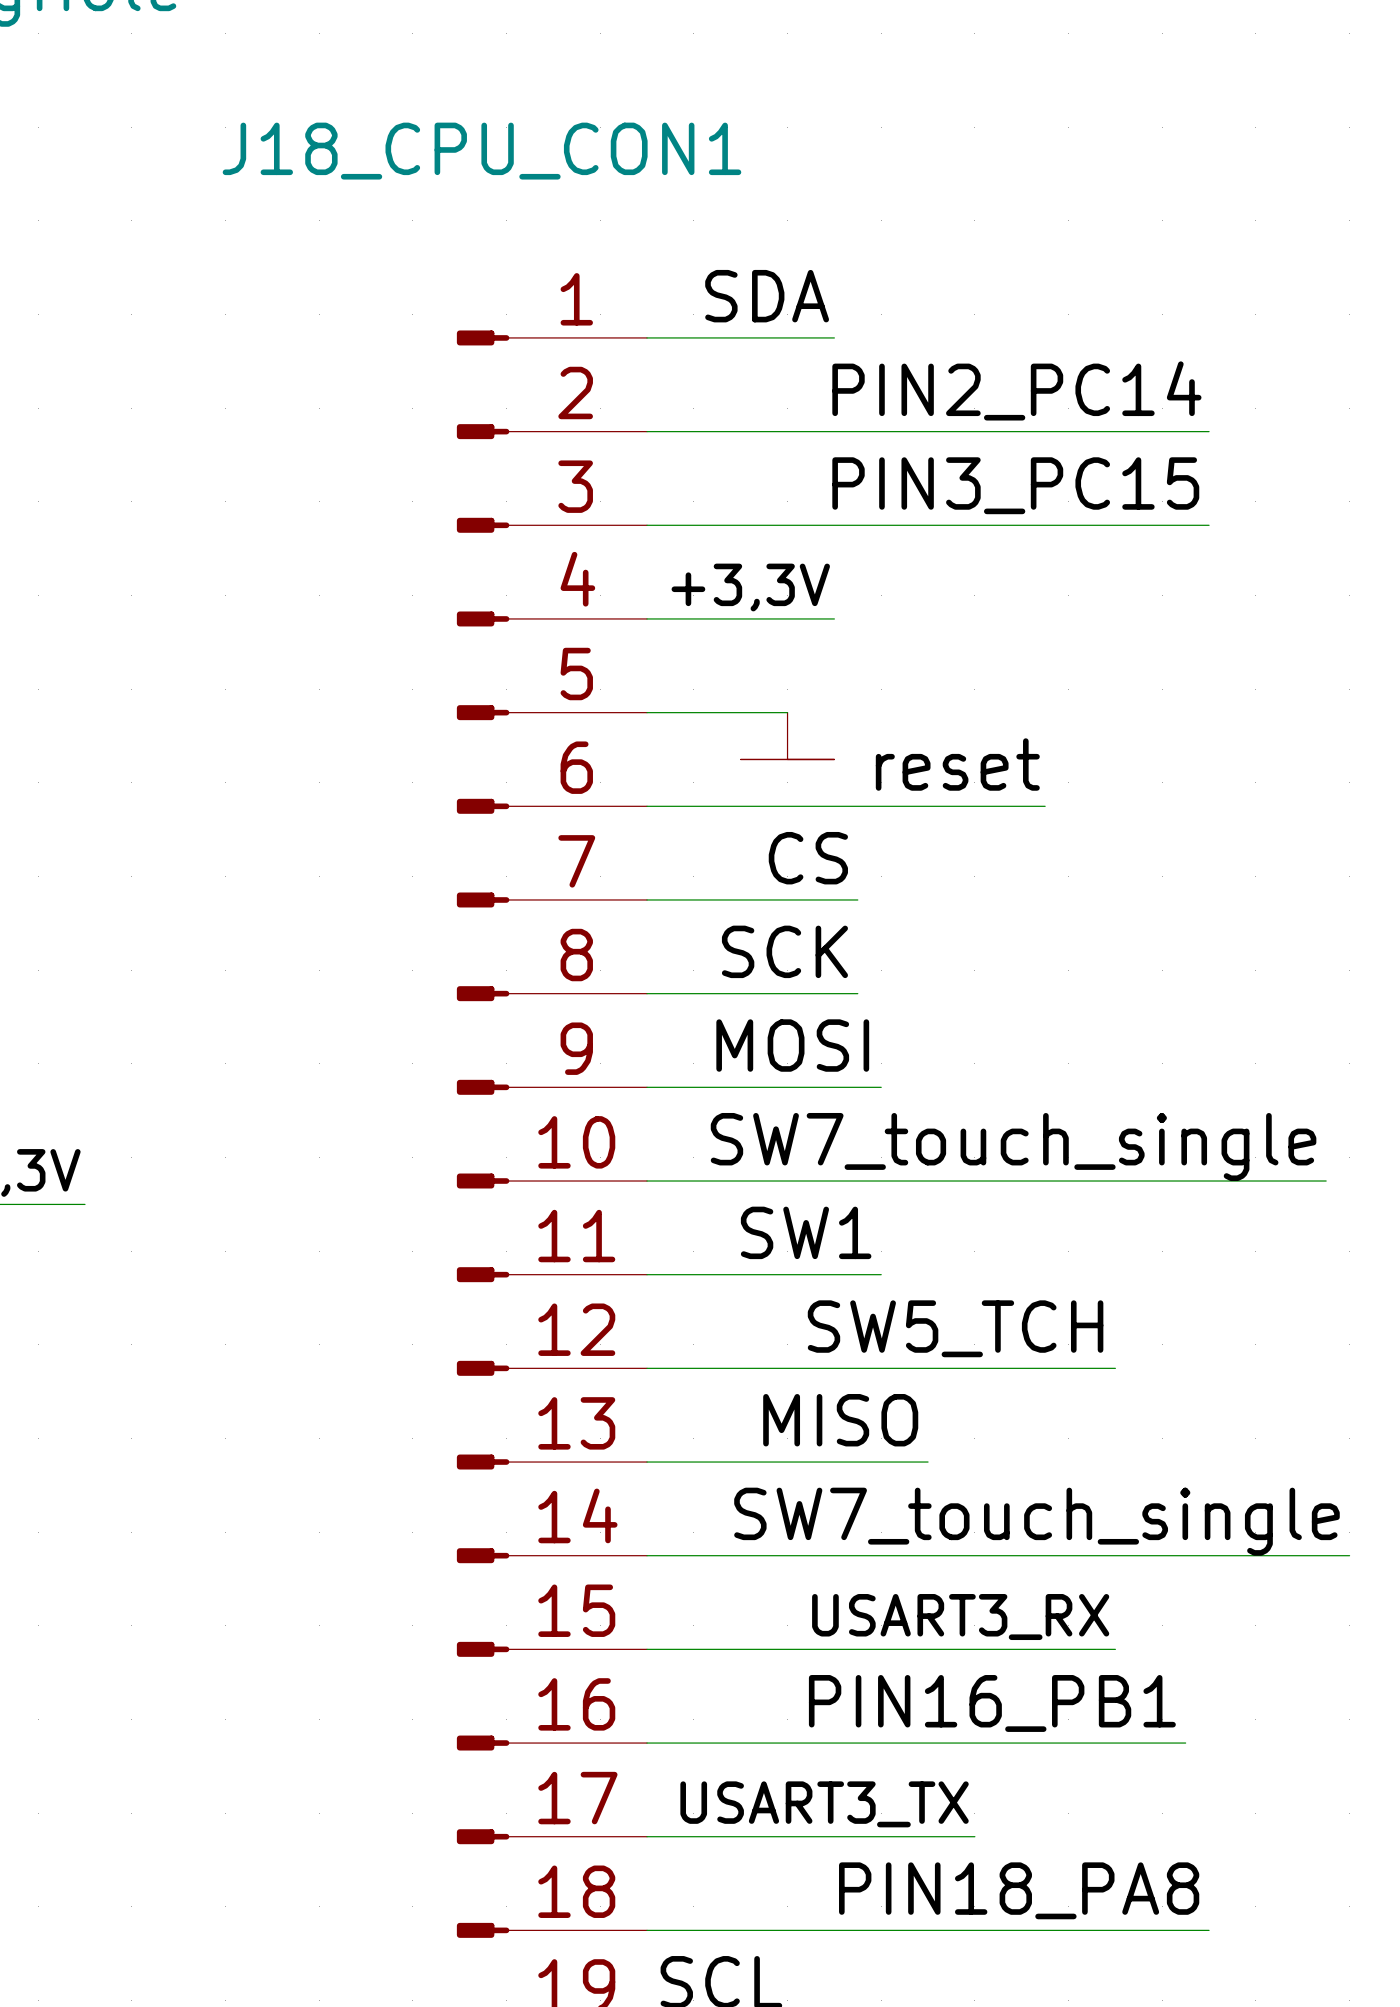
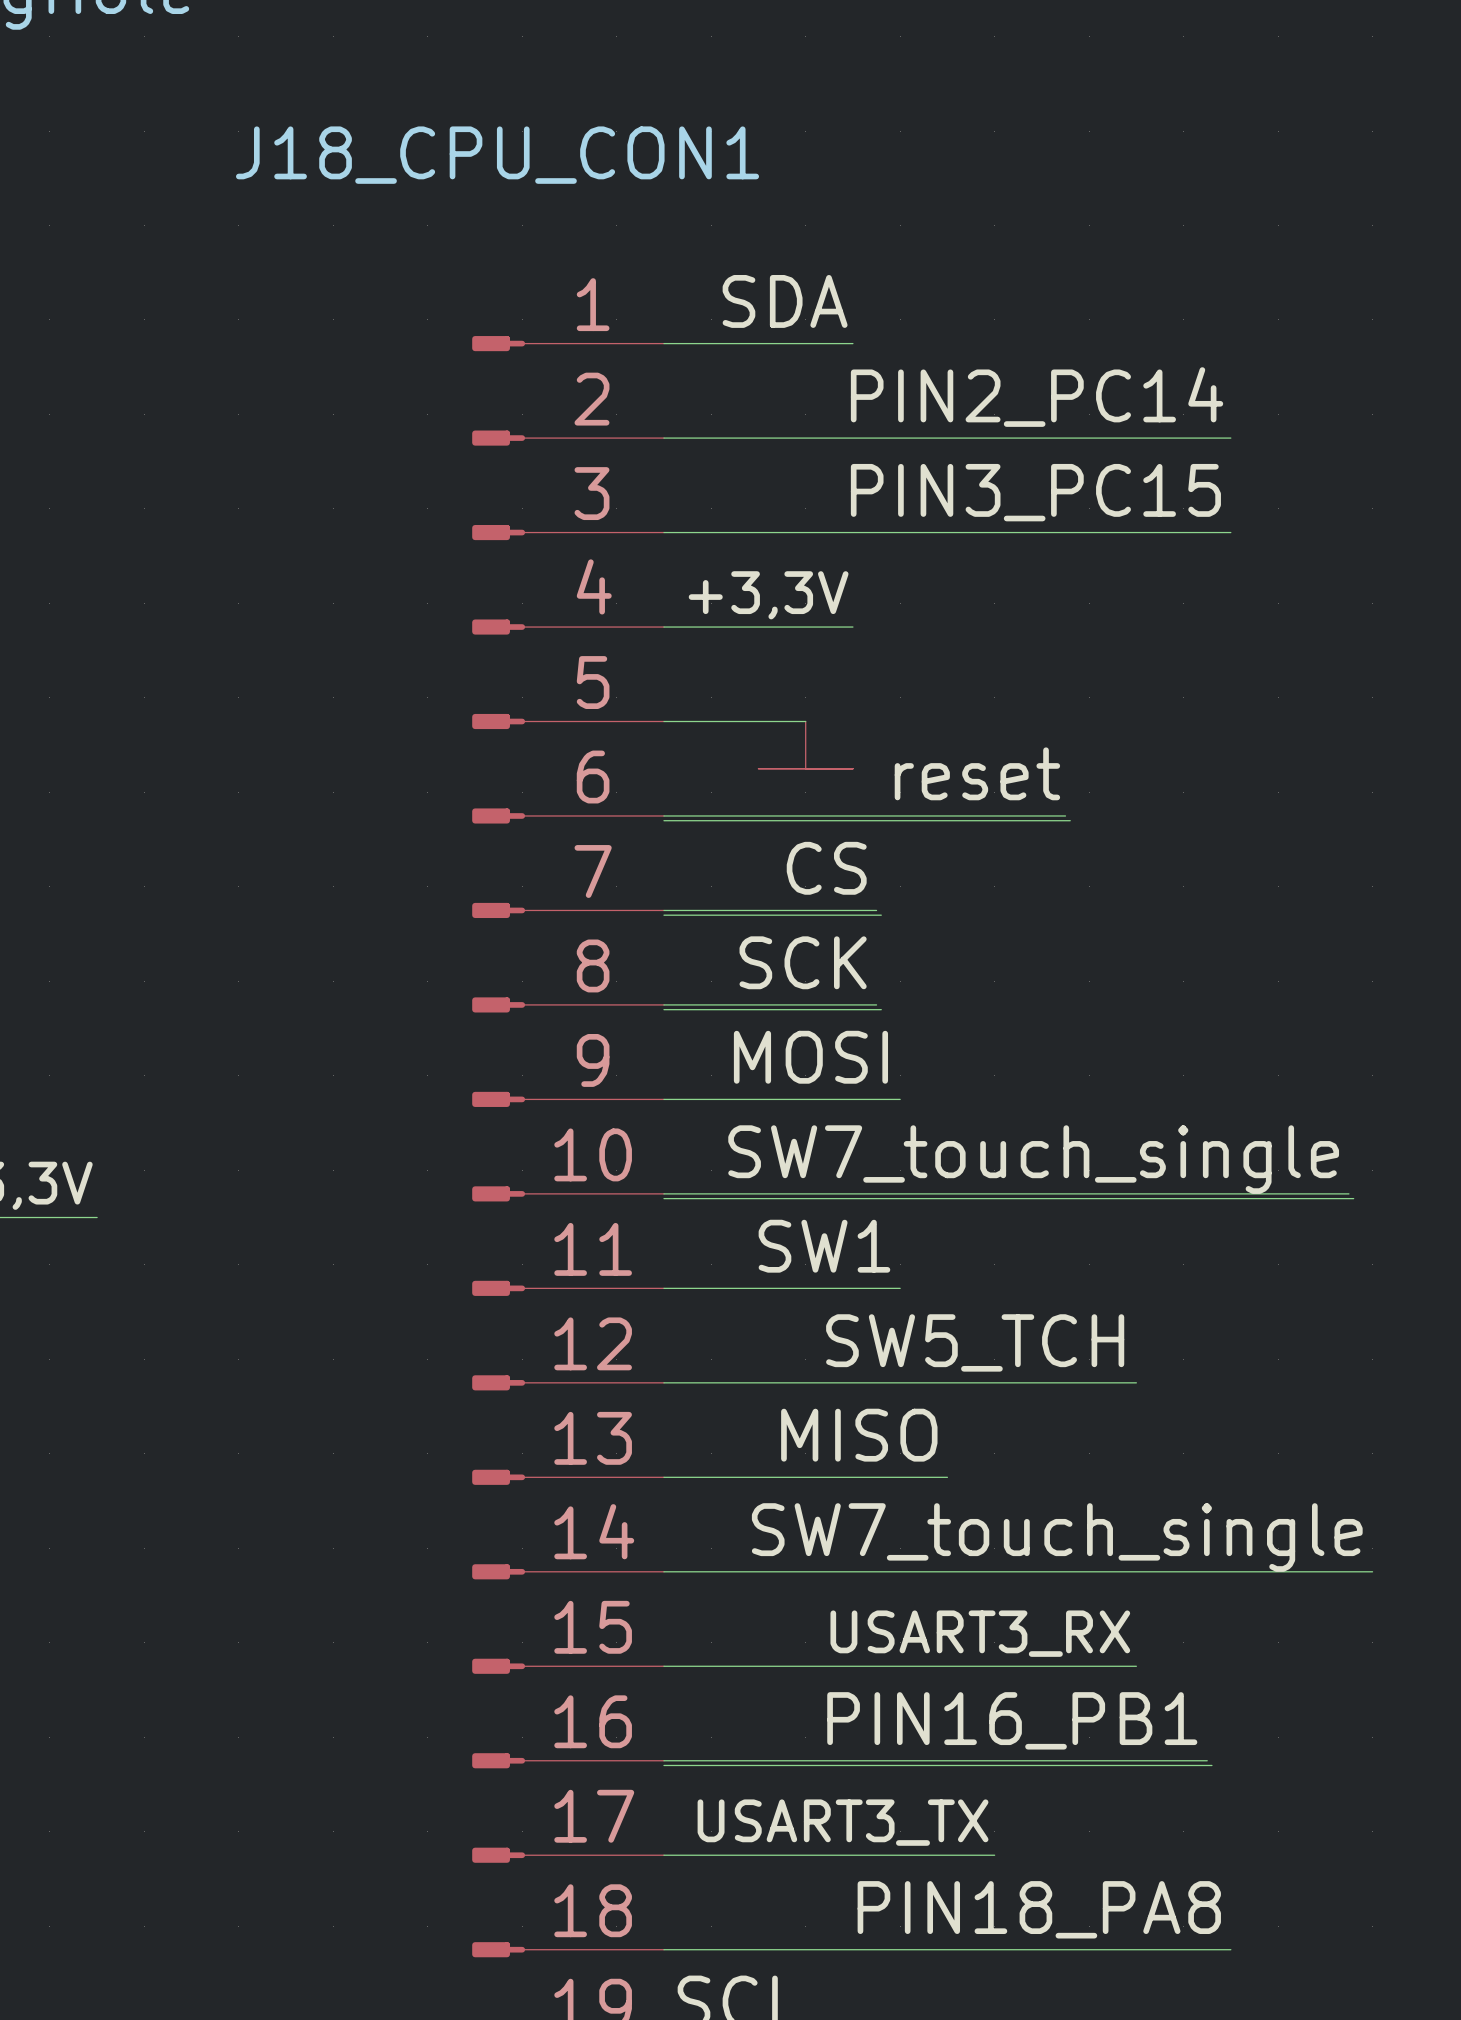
wire: none -> (663, 820) (1070, 820)
wire: none -> (663, 915) (881, 915)
wire: none -> (663, 1009) (881, 1009)
wire: none -> (663, 1198) (1353, 1198)
wire: none -> (663, 1765) (1211, 1765)

